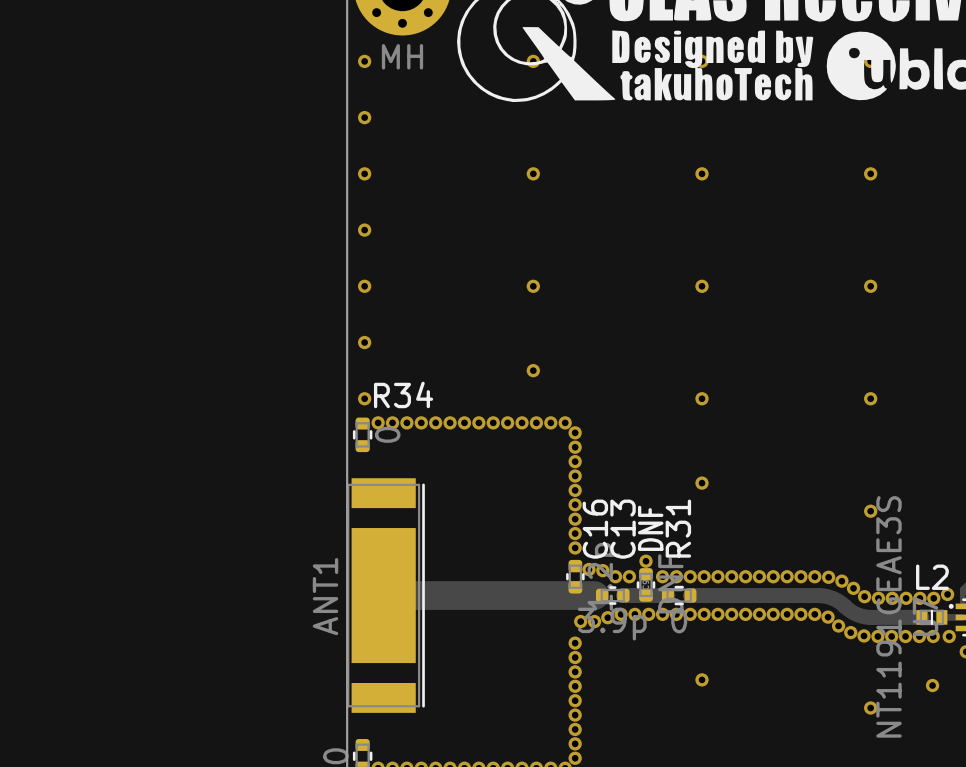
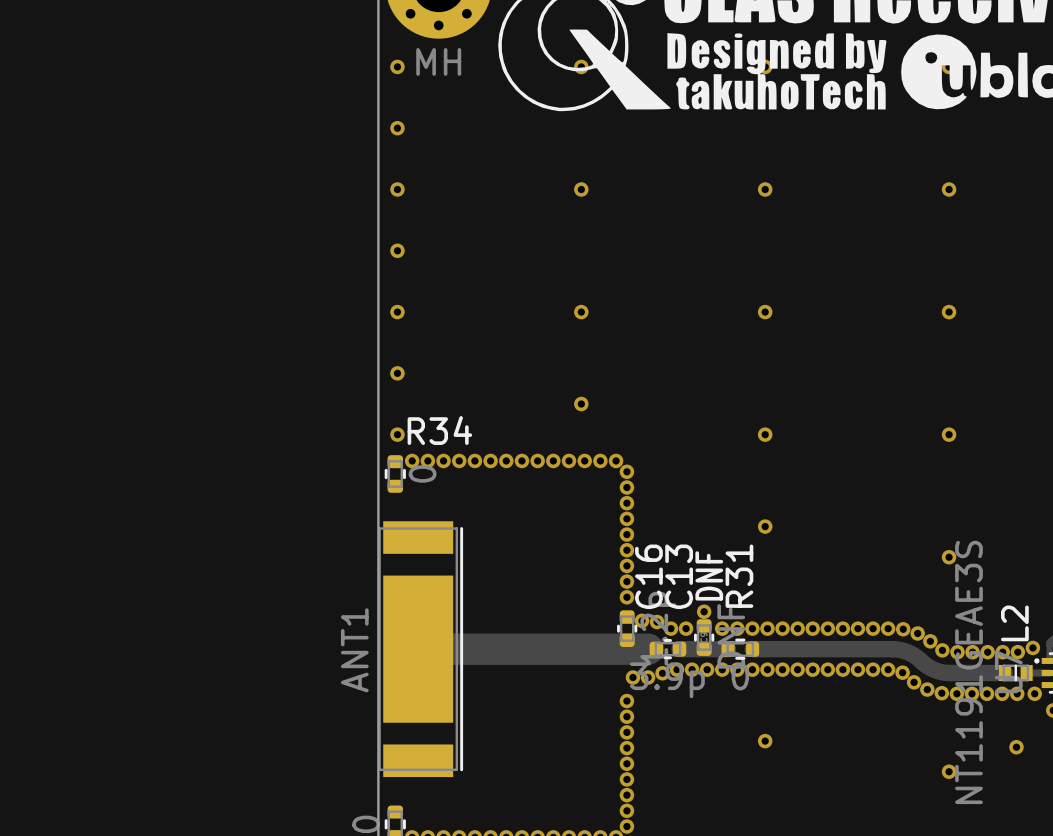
L2 name rotation: 0° (932, 577) -> 90° counterclockwise (1014, 623)

